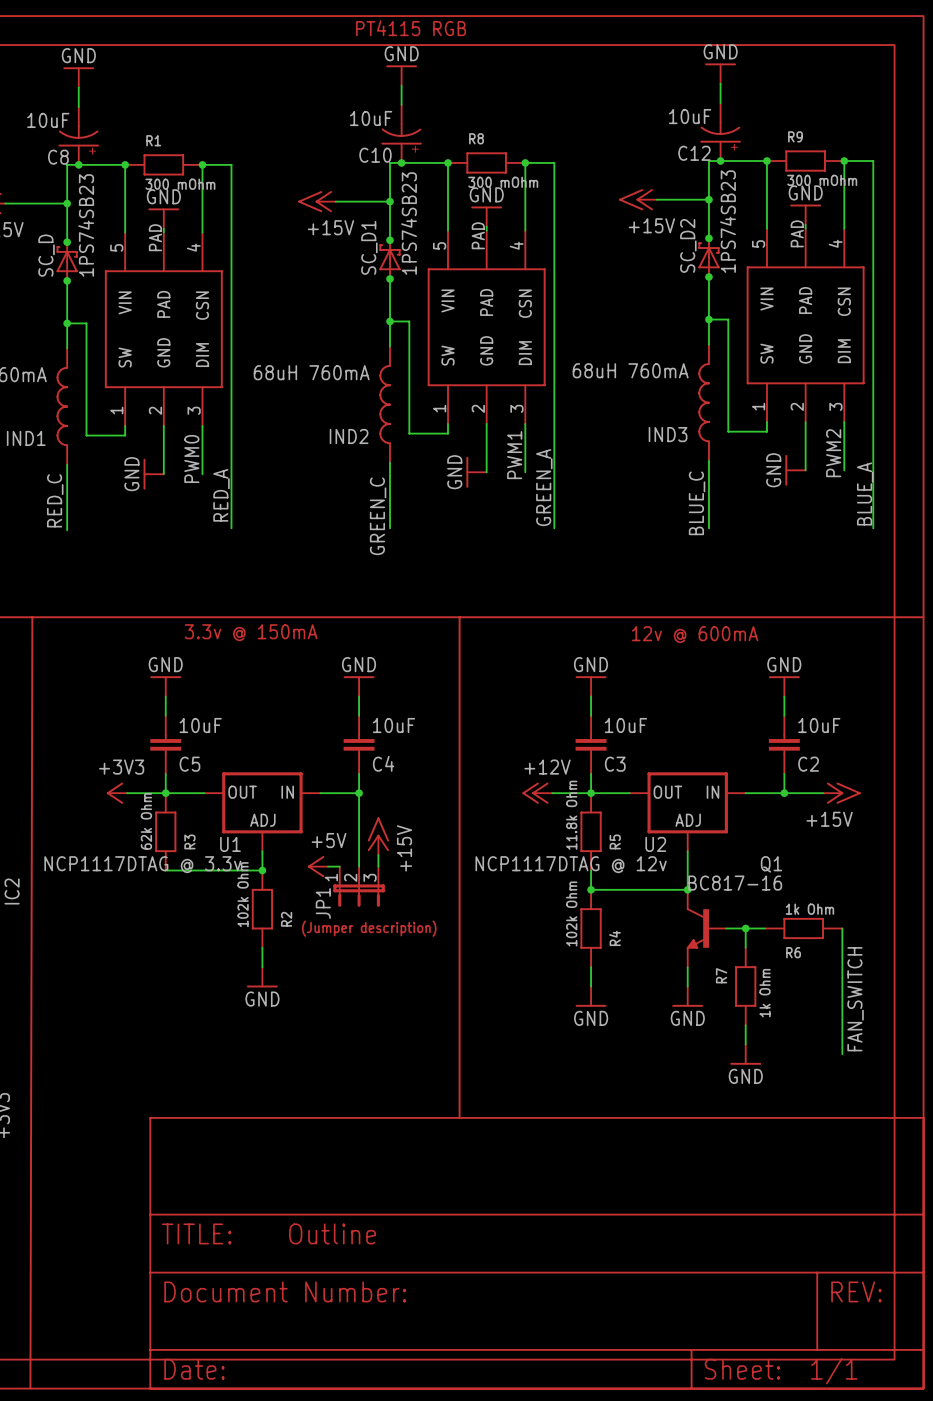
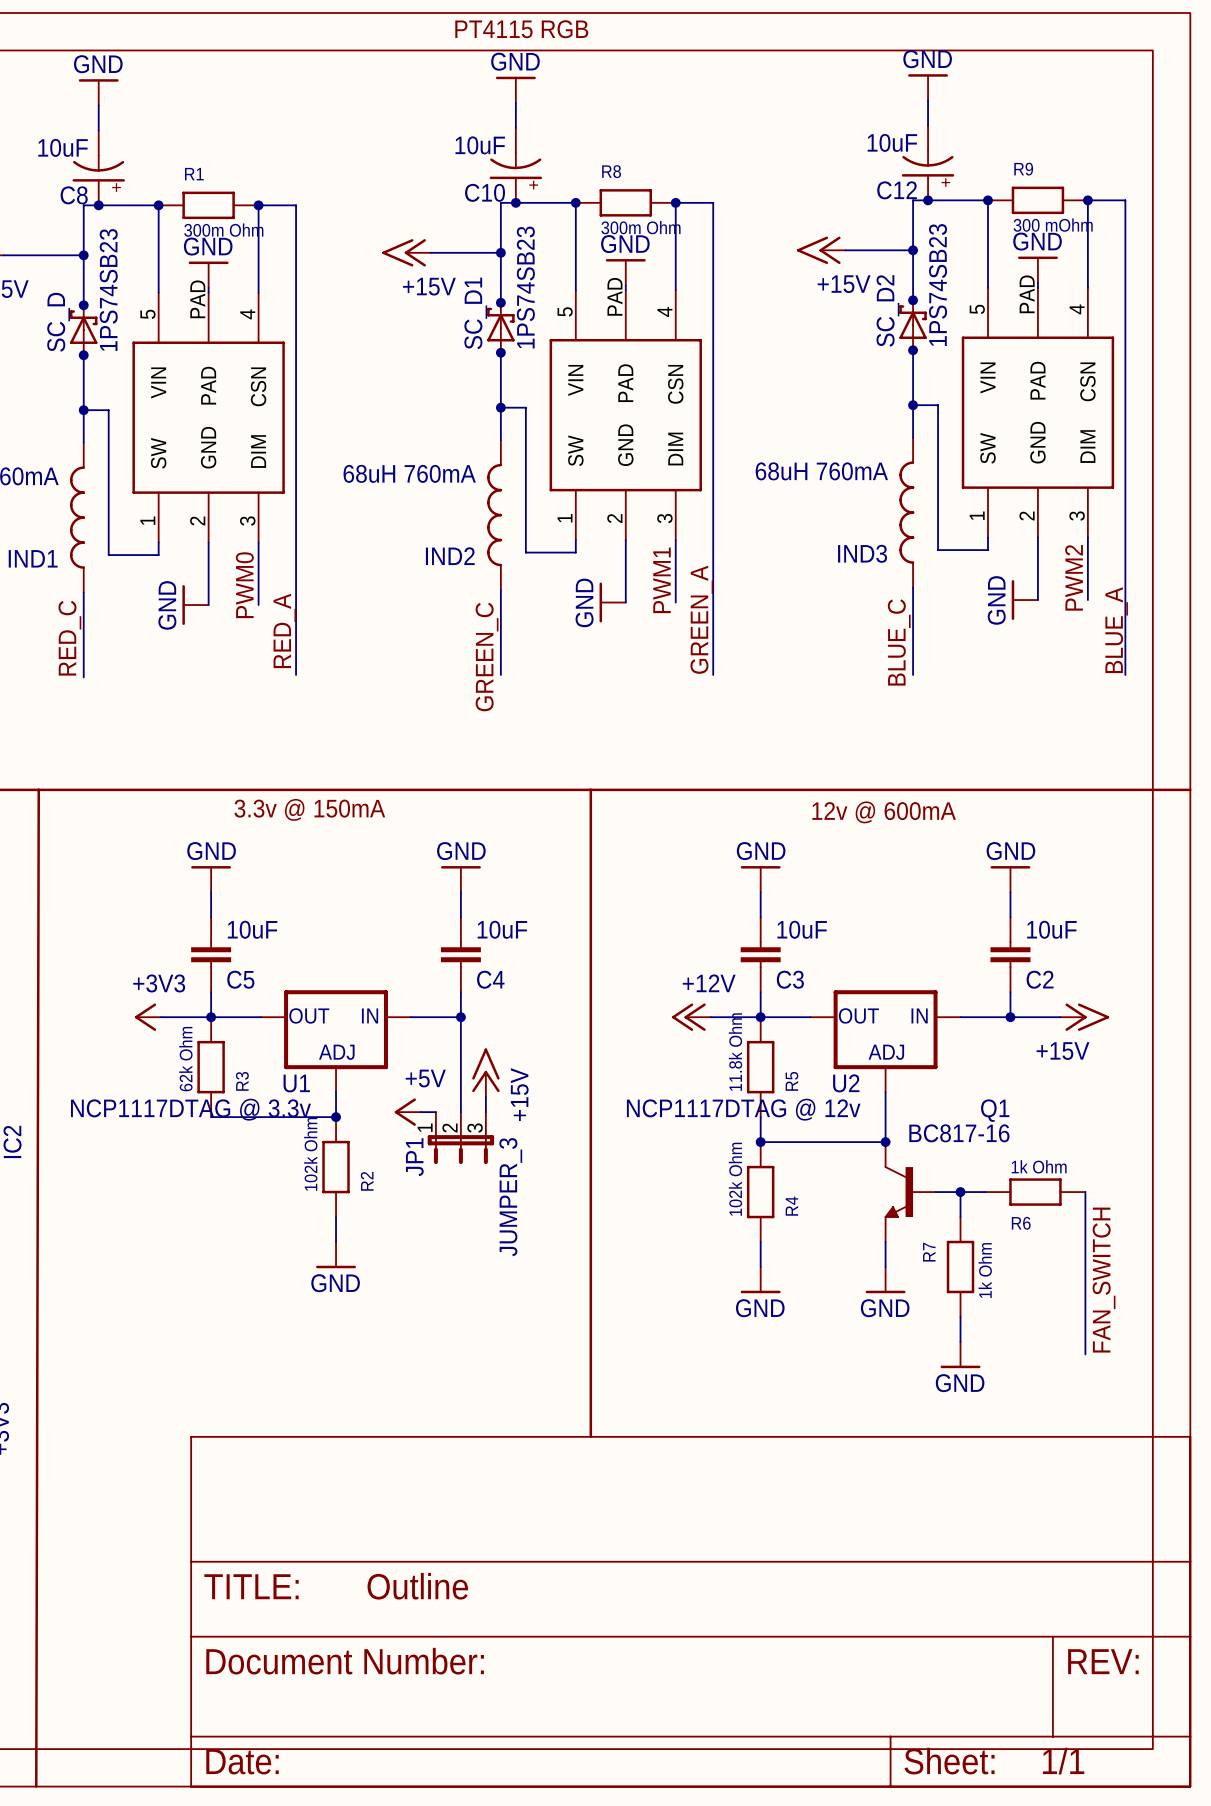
R8 value: 300 mOhm (503, 182) -> 300m Ohm (640, 227)
R1 value: 300 mOhm (180, 184) -> 300m Ohm (223, 230)
part: (369, 928) -> none
JP1 value: none -> JUMPER_3 (510, 1197)

